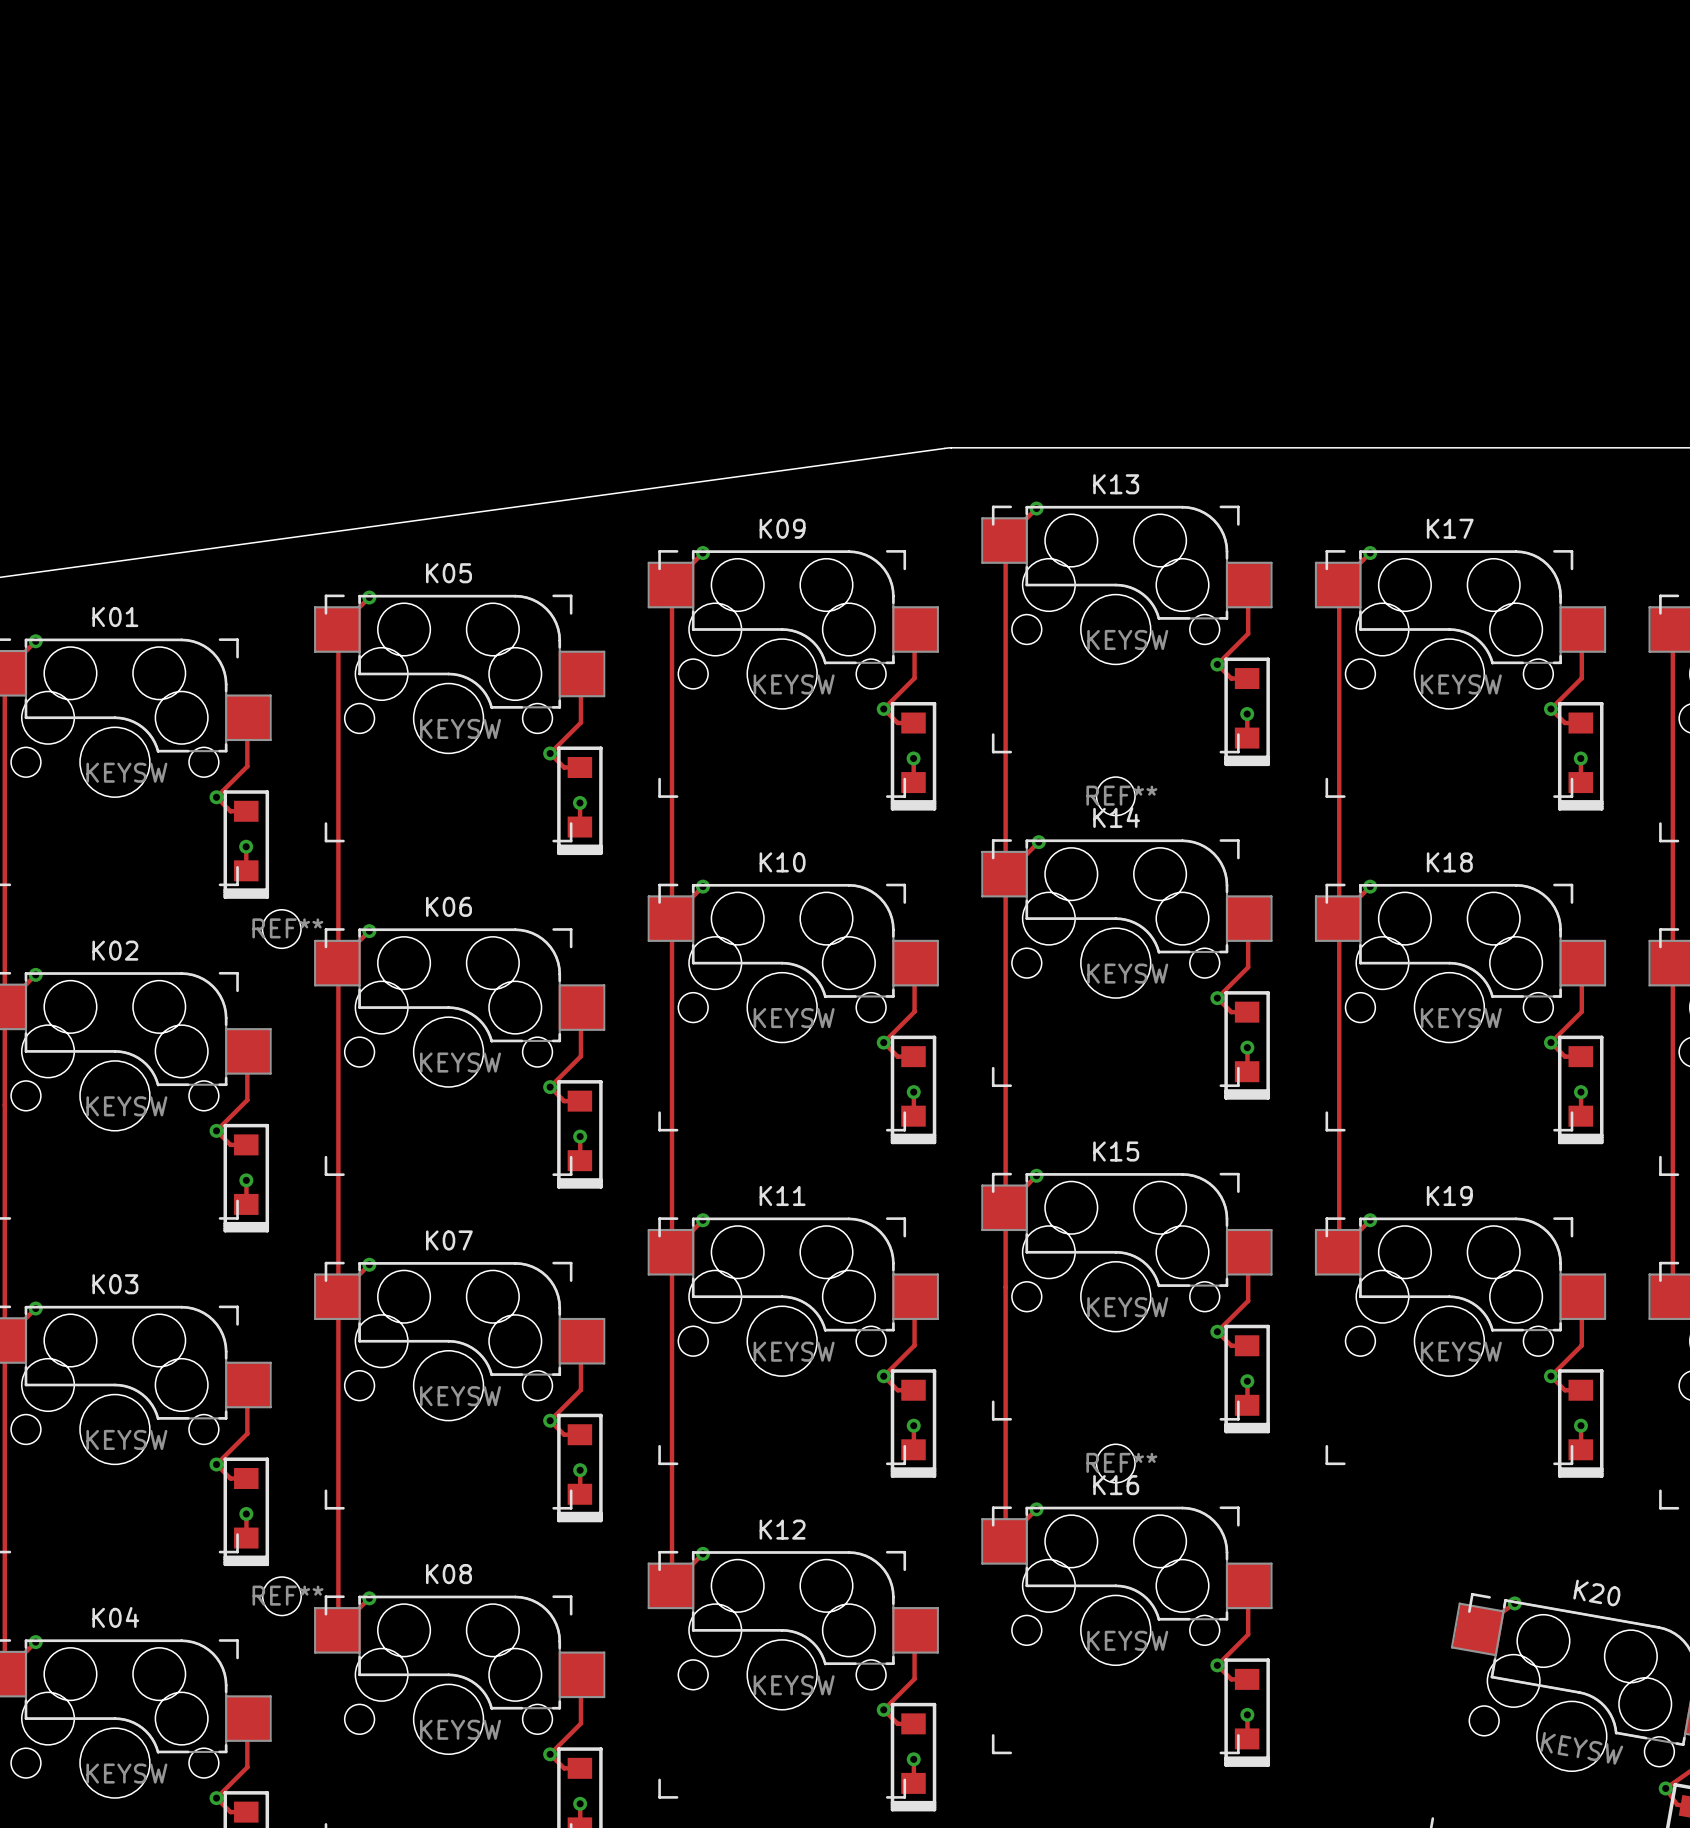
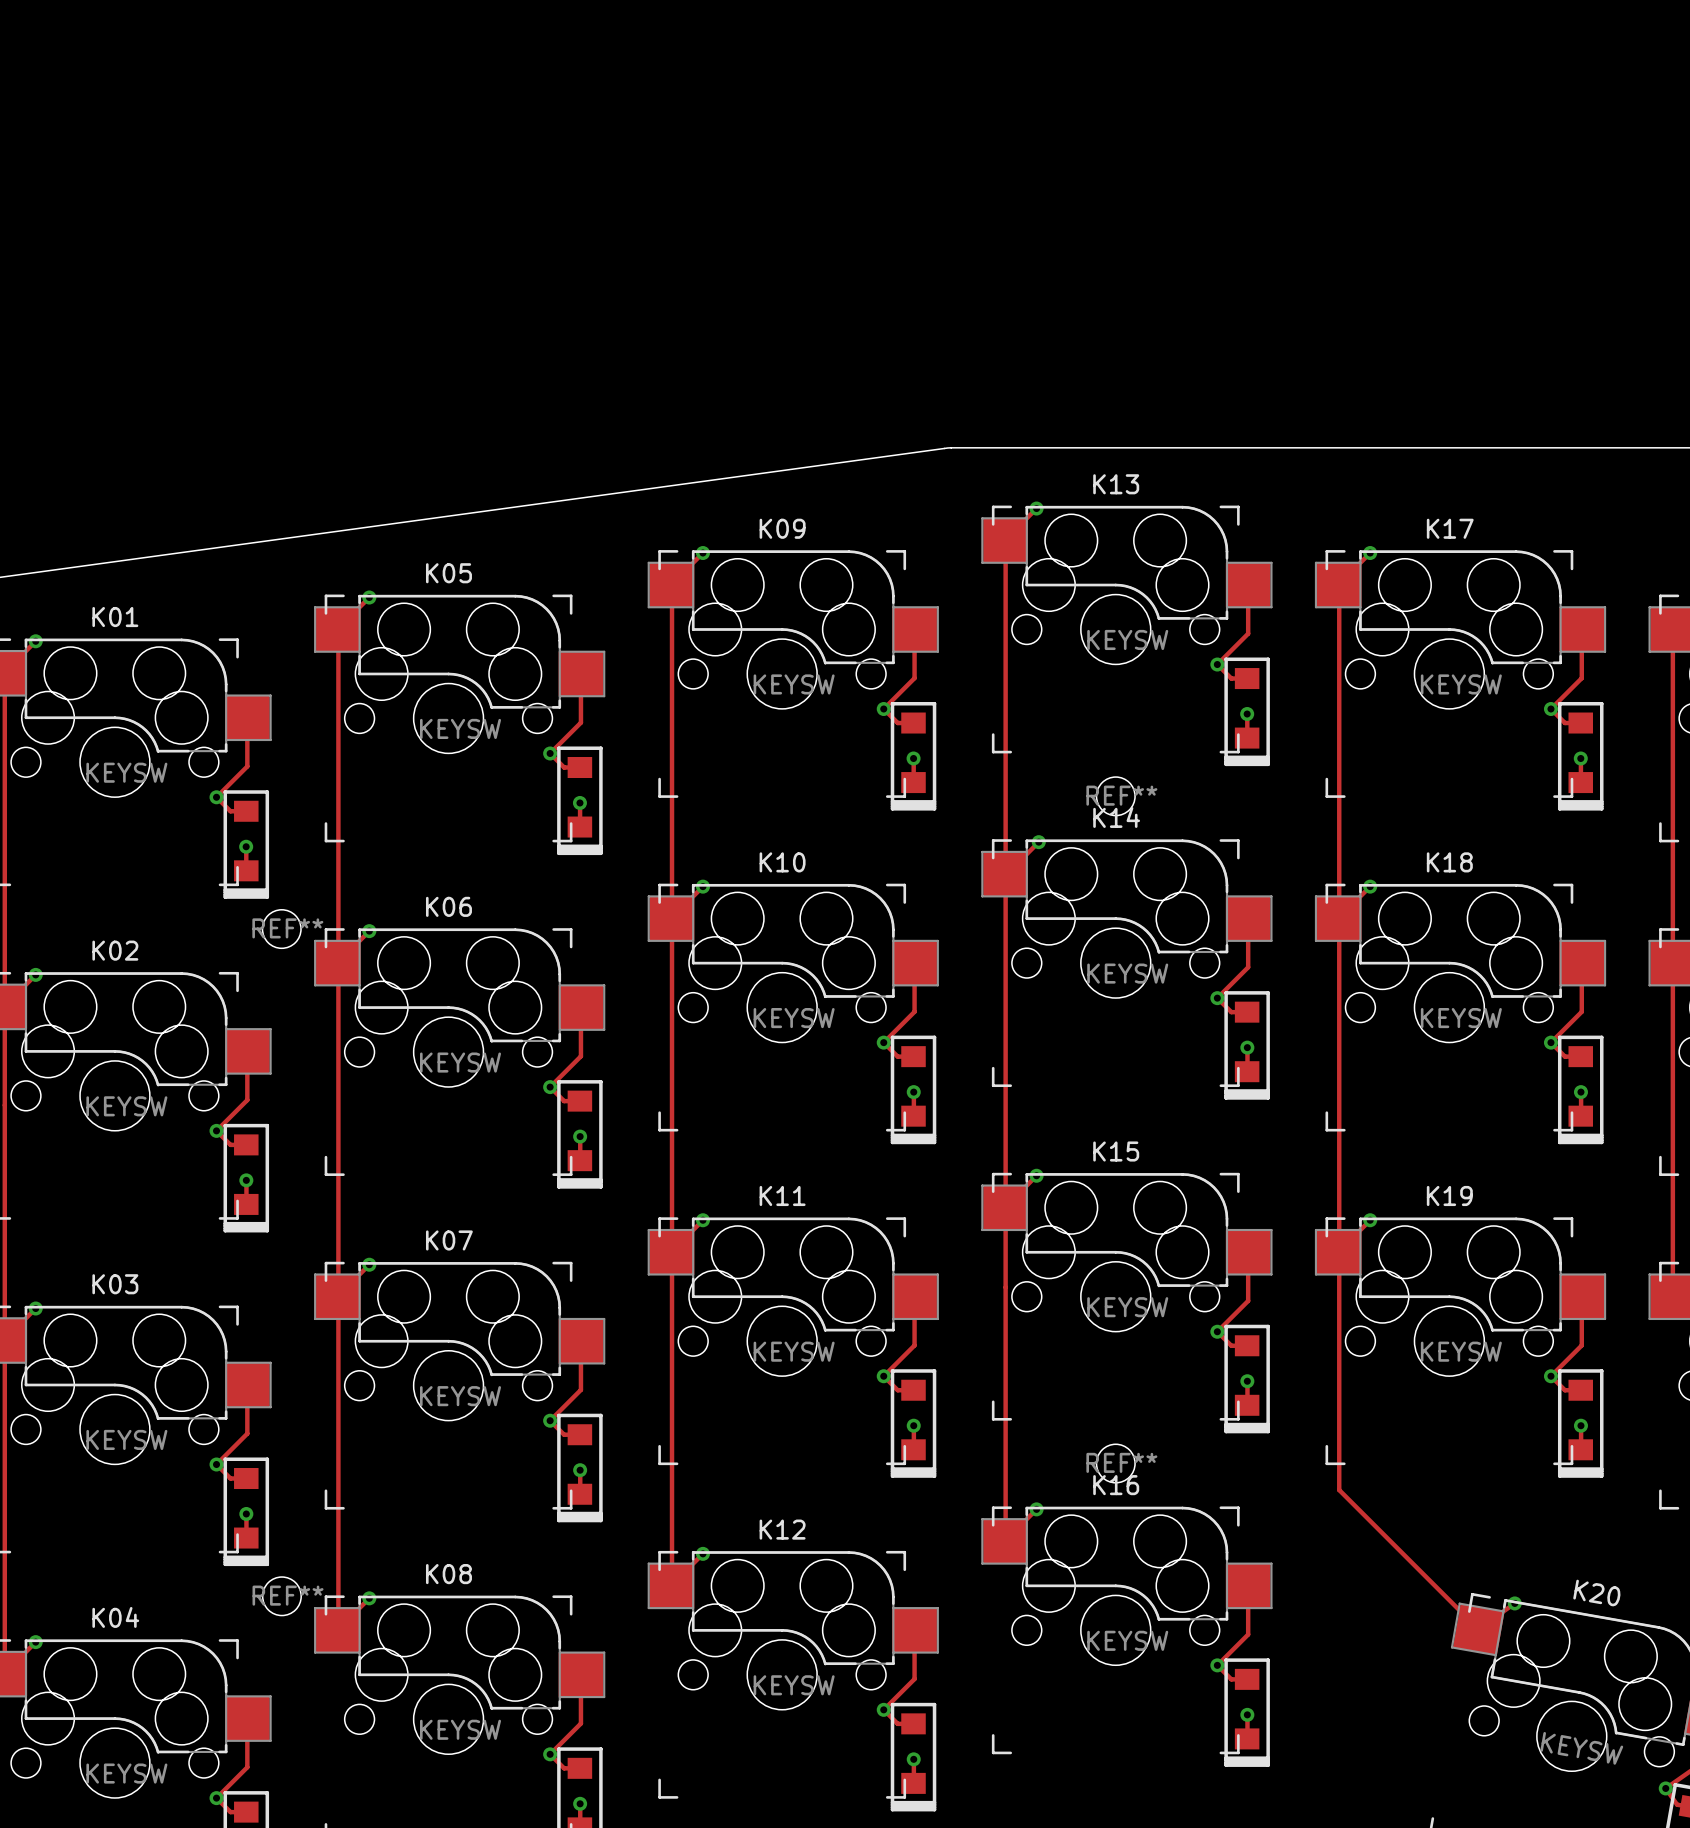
track: none -> (1339, 1252) (1339, 1490) (1478, 1629)

